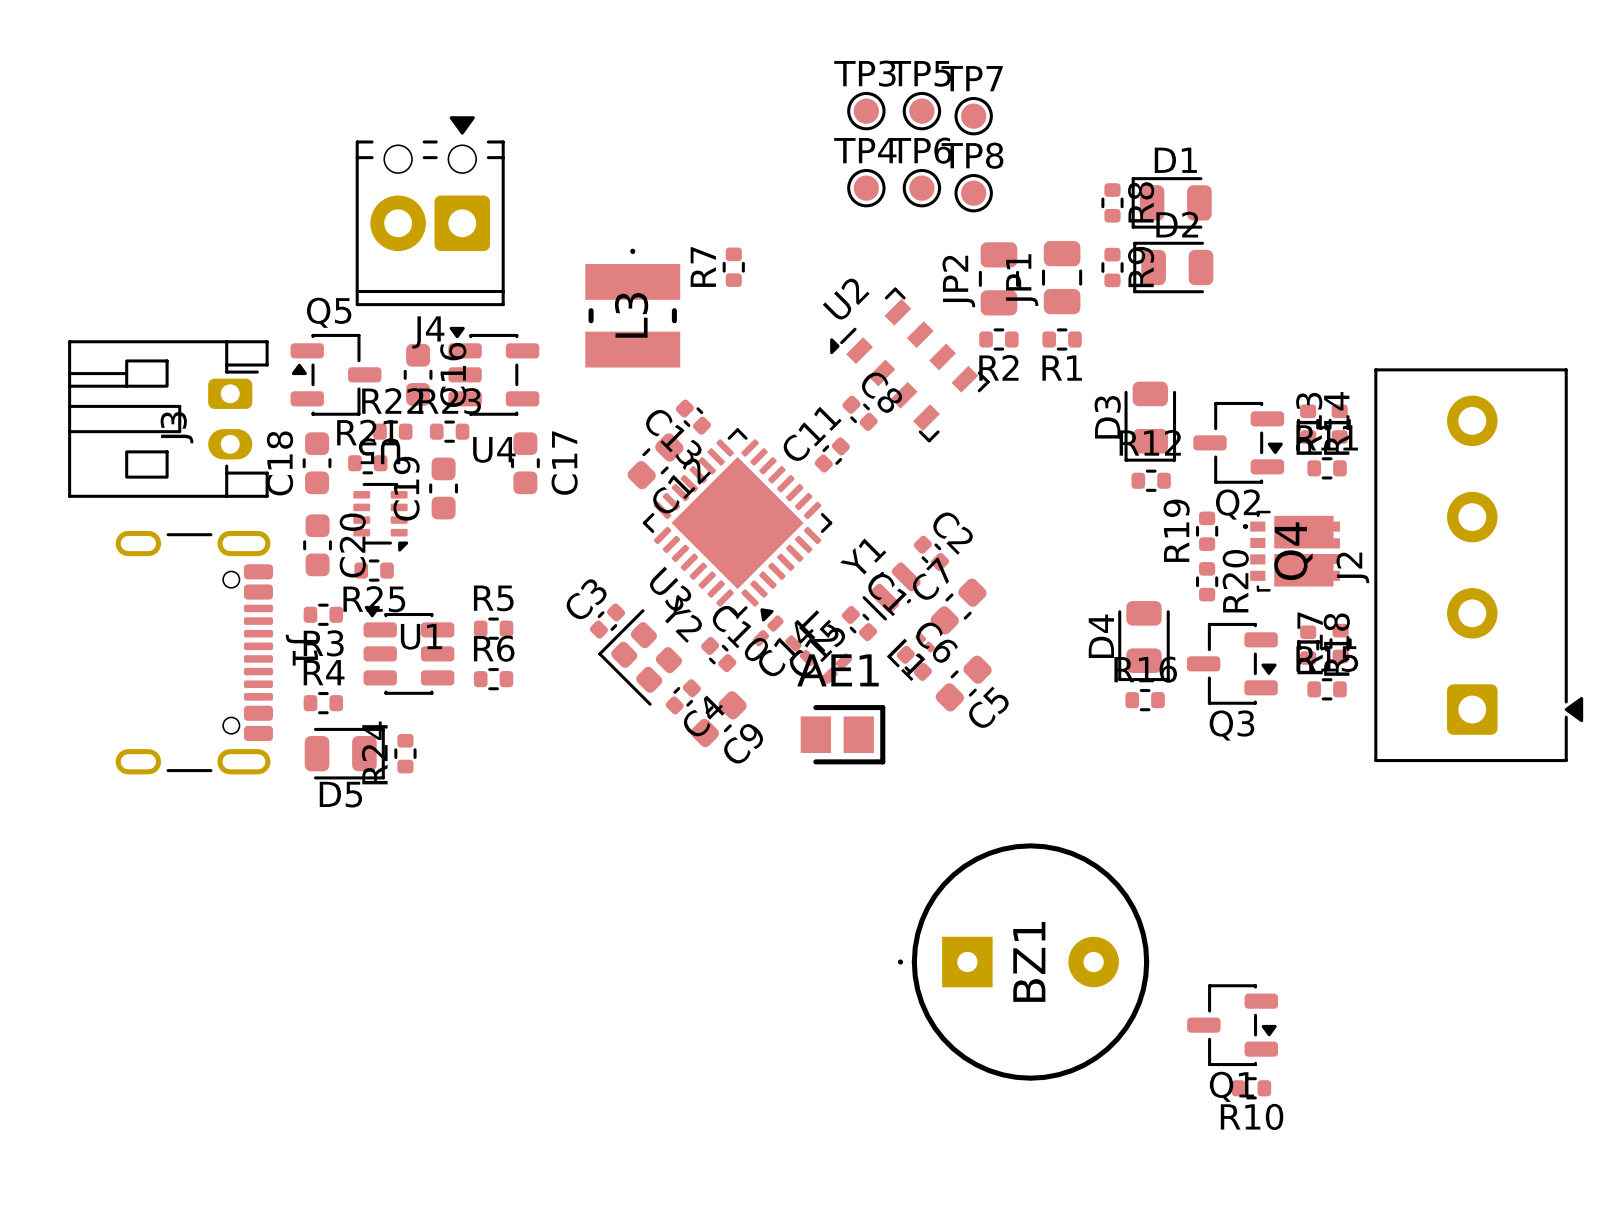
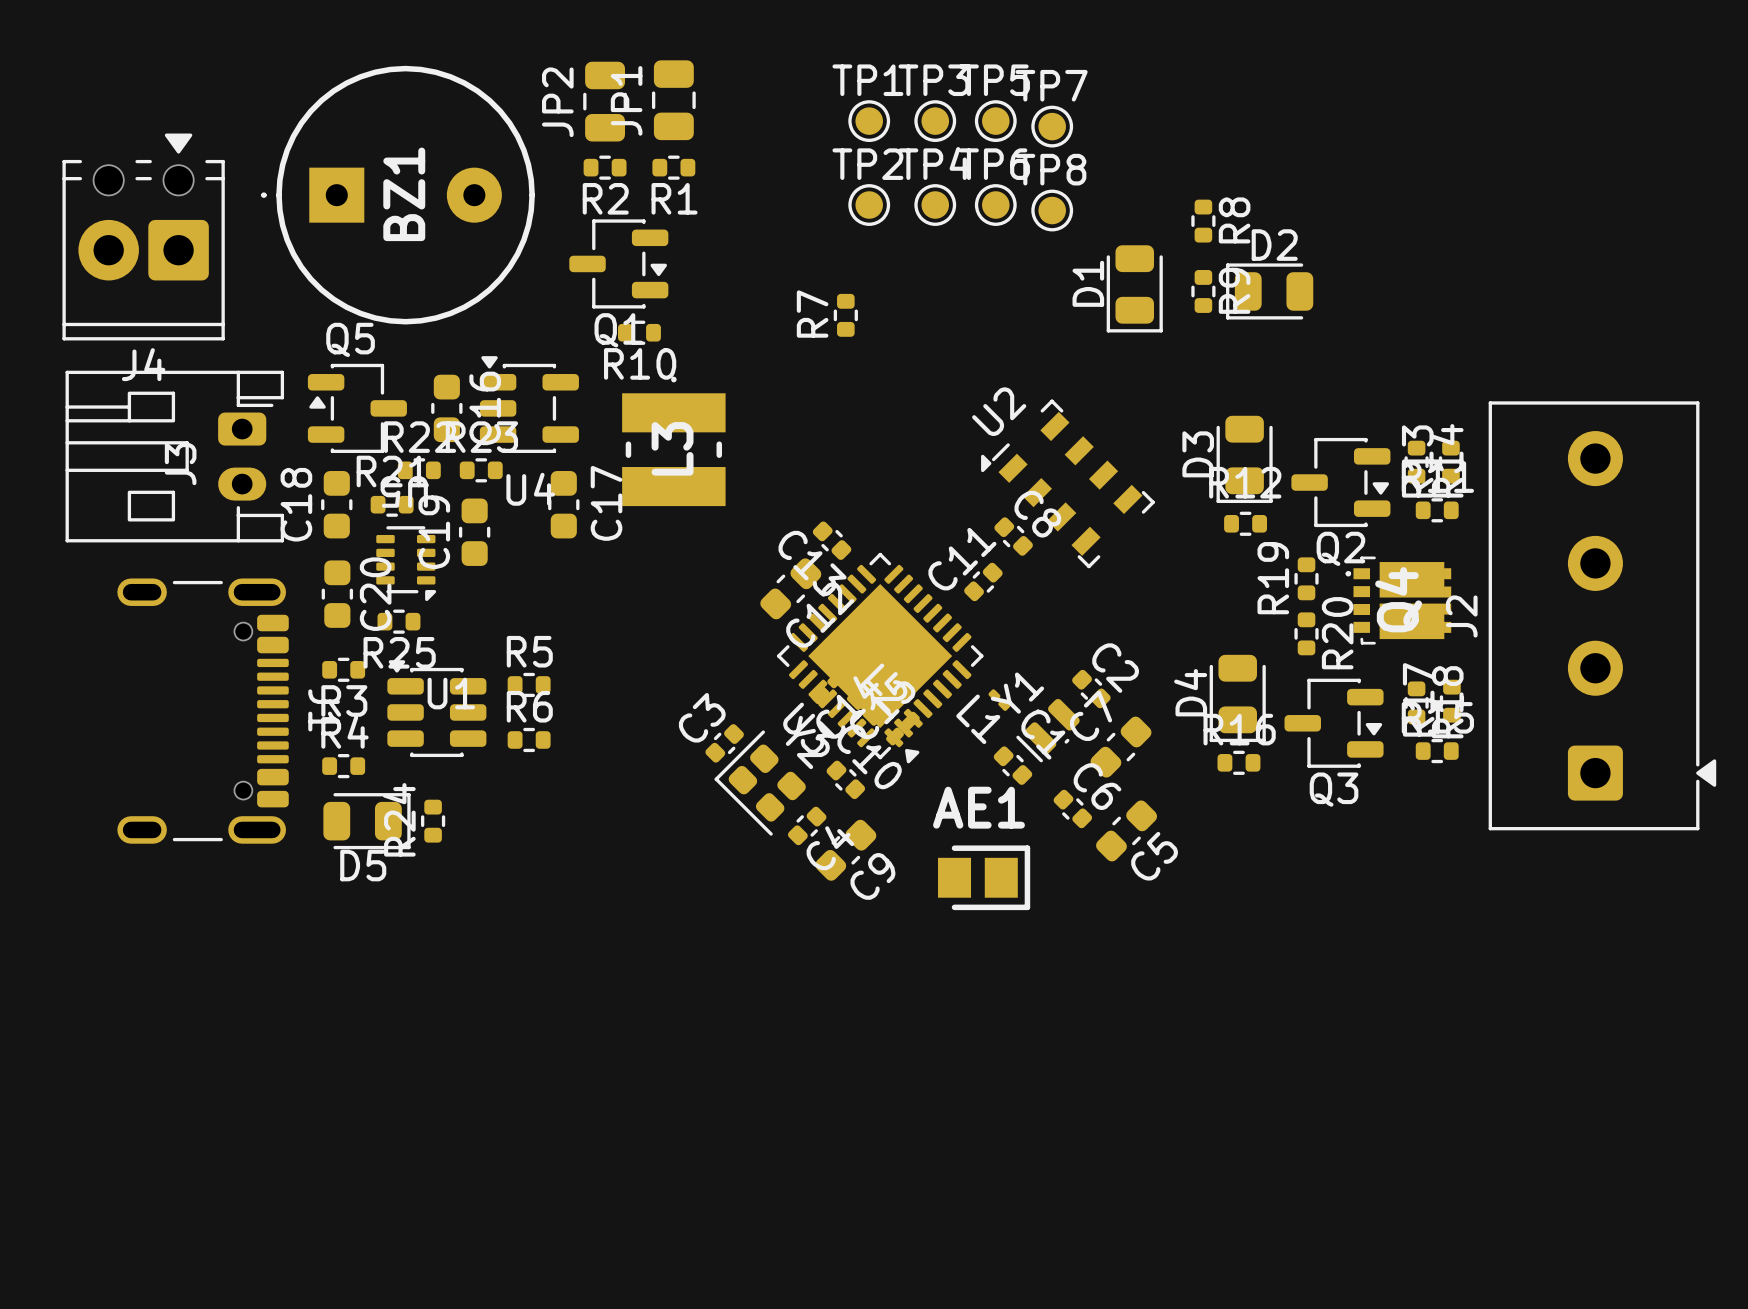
TP1: none -> (869, 121)
TP2: none -> (869, 205)
D1 rotation: 0° (1171, 202) -> 90° counterclockwise (1134, 288)
D1 position: (1171, 202) -> (1134, 288)
J4 position: (430, 211) -> (143, 236)
R7 position: (733, 267) -> (845, 315)
JP1 position: (1062, 277) -> (673, 100)
JP2 position: (998, 278) -> (605, 101)
L3 position: (632, 308) -> (673, 441)
R2 position: (998, 339) -> (605, 167)
R1 position: (1062, 339) -> (673, 167)
U2 position: (909, 364) -> (1067, 483)
C8 position: (860, 413) -> (1013, 536)
C13 position: (693, 417) -> (832, 540)
C11 position: (832, 455) -> (983, 581)
C12 position: (655, 461) -> (790, 588)
U3 position: (737, 524) -> (880, 658)
C2 position: (931, 553) -> (1091, 689)
Y1 position: (891, 591) -> (1047, 730)
C7 position: (958, 606) -> (1120, 747)
C3 position: (607, 621) -> (724, 743)
C1 position: (859, 623) -> (1013, 765)
C10 position: (718, 654) -> (845, 779)
Y2 position: (640, 657) -> (760, 783)
C6 position: (914, 663) -> (1072, 808)
C5 position: (963, 683) -> (1126, 830)
C4 position: (683, 696) -> (807, 825)
C9 position: (718, 719) -> (845, 850)
AE1 position: (843, 734) -> (984, 877)
BZ1 position: (1023, 962) -> (398, 195)
Q1 position: (1232, 1025) -> (618, 263)
R10 position: (1251, 1088) -> (639, 332)

